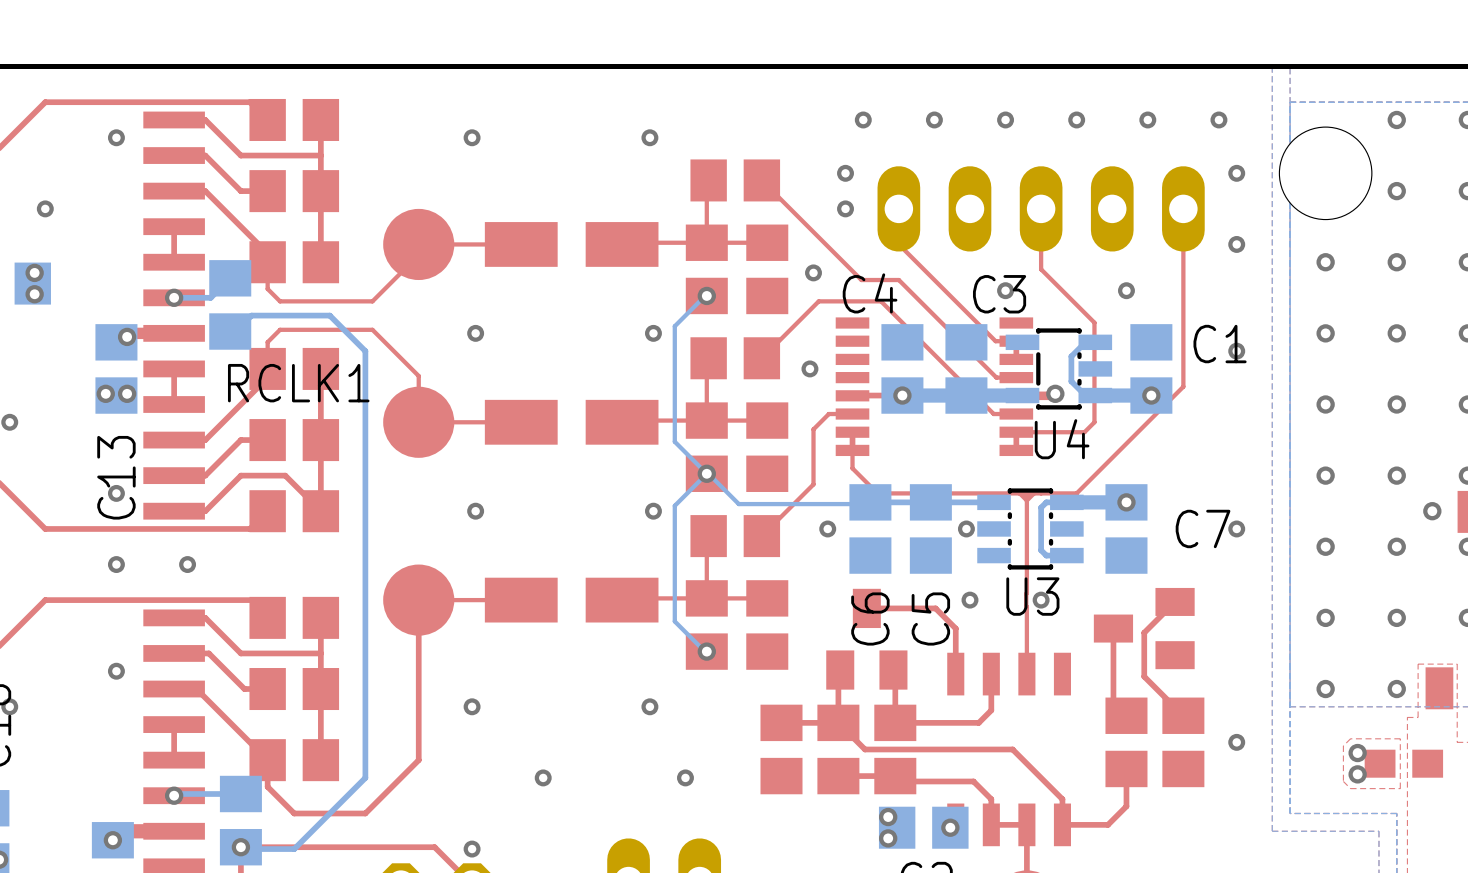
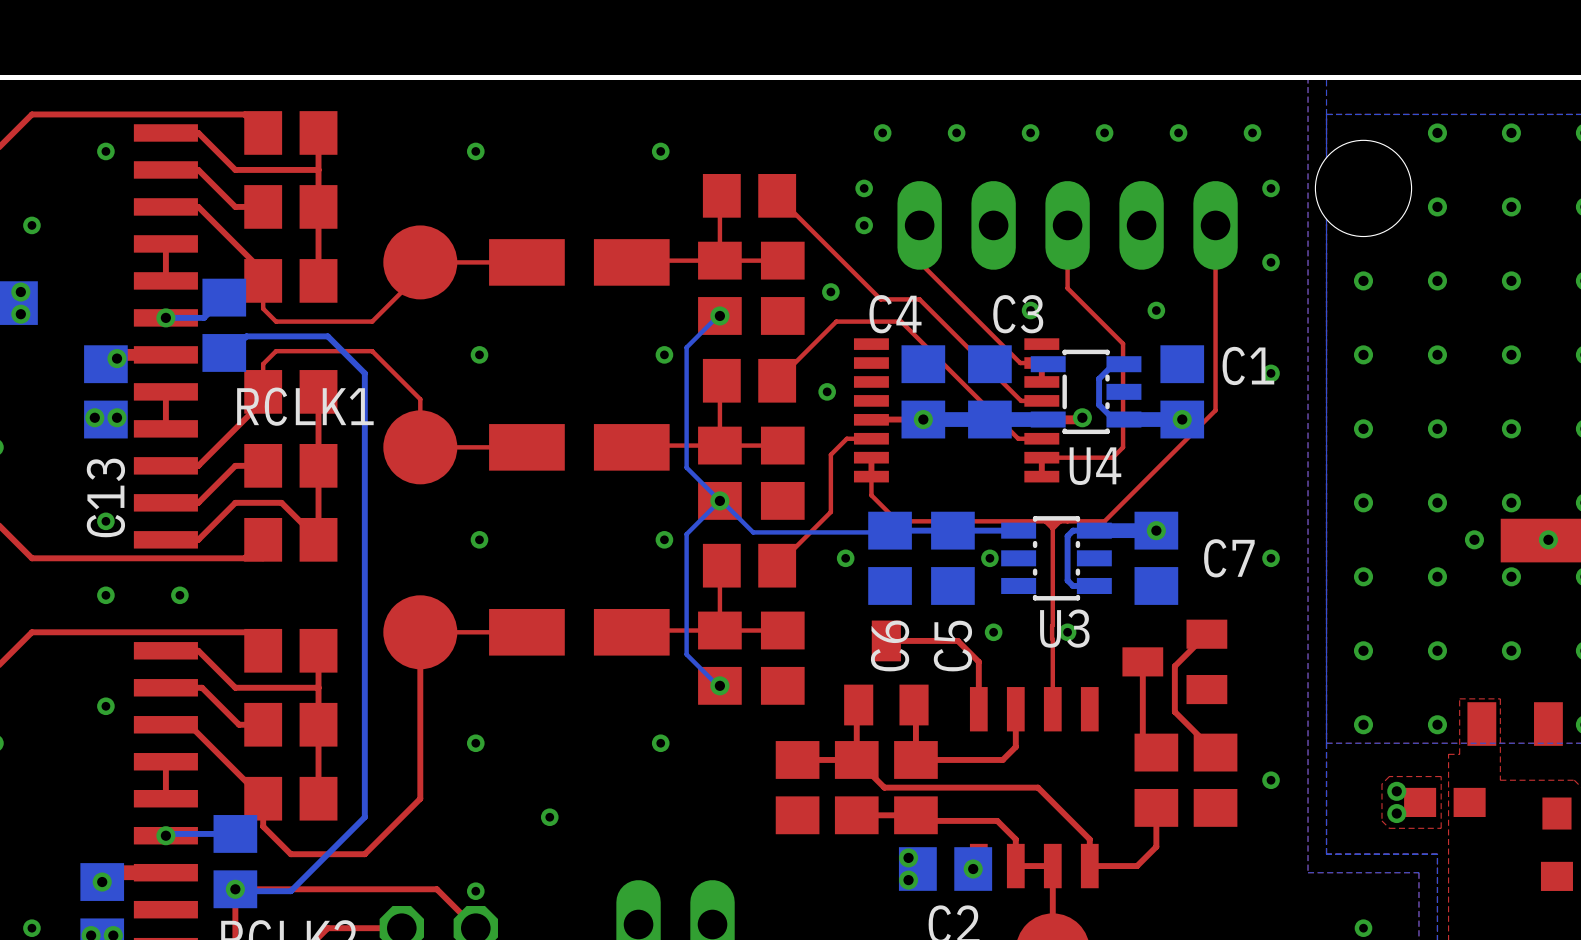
via: (685, 777) -> none

